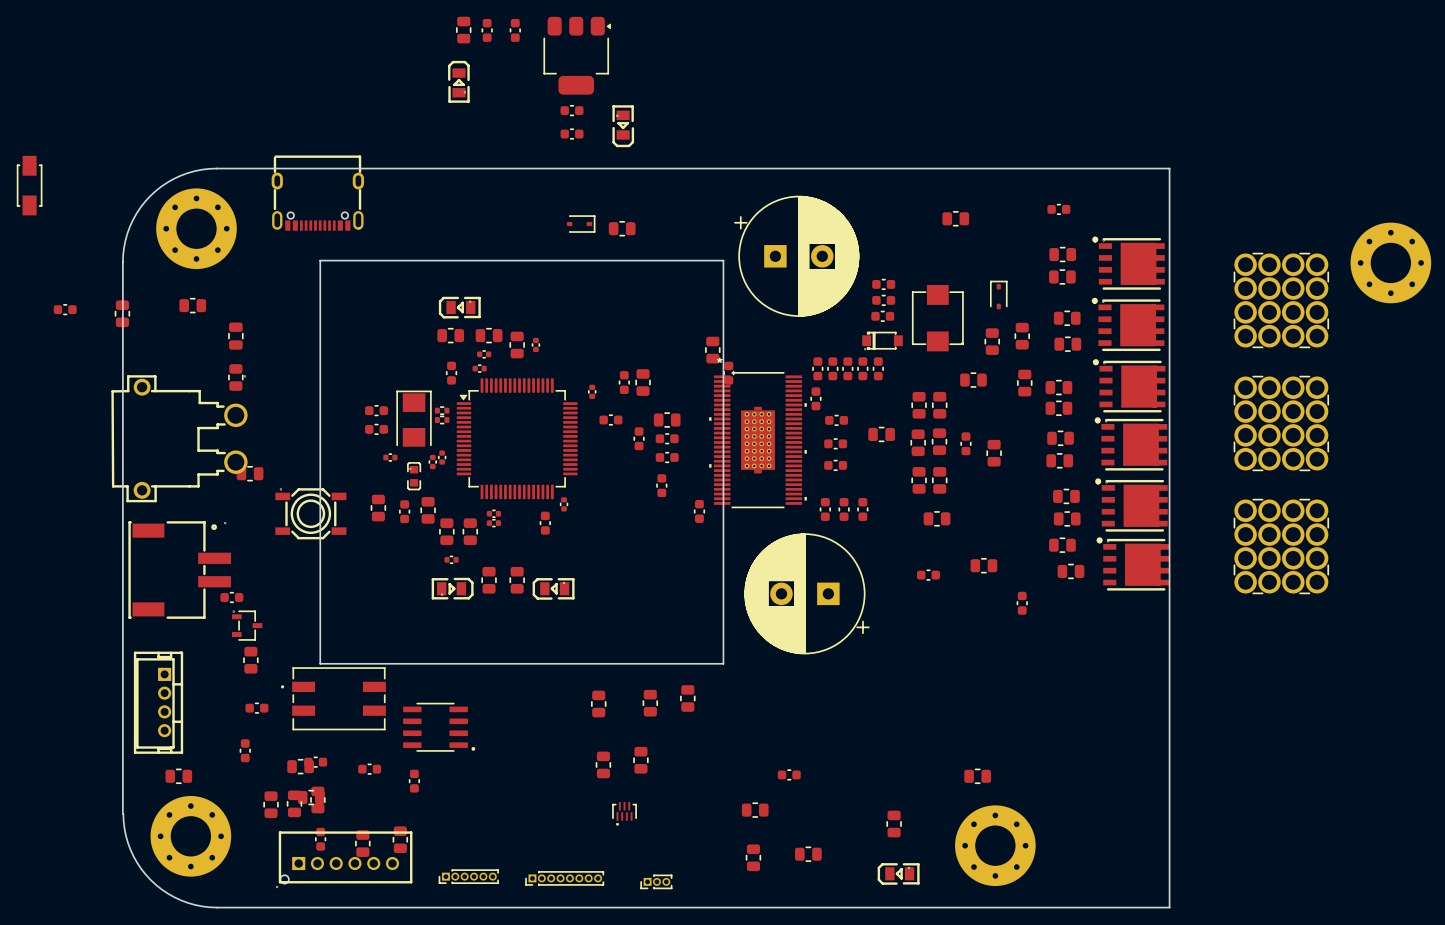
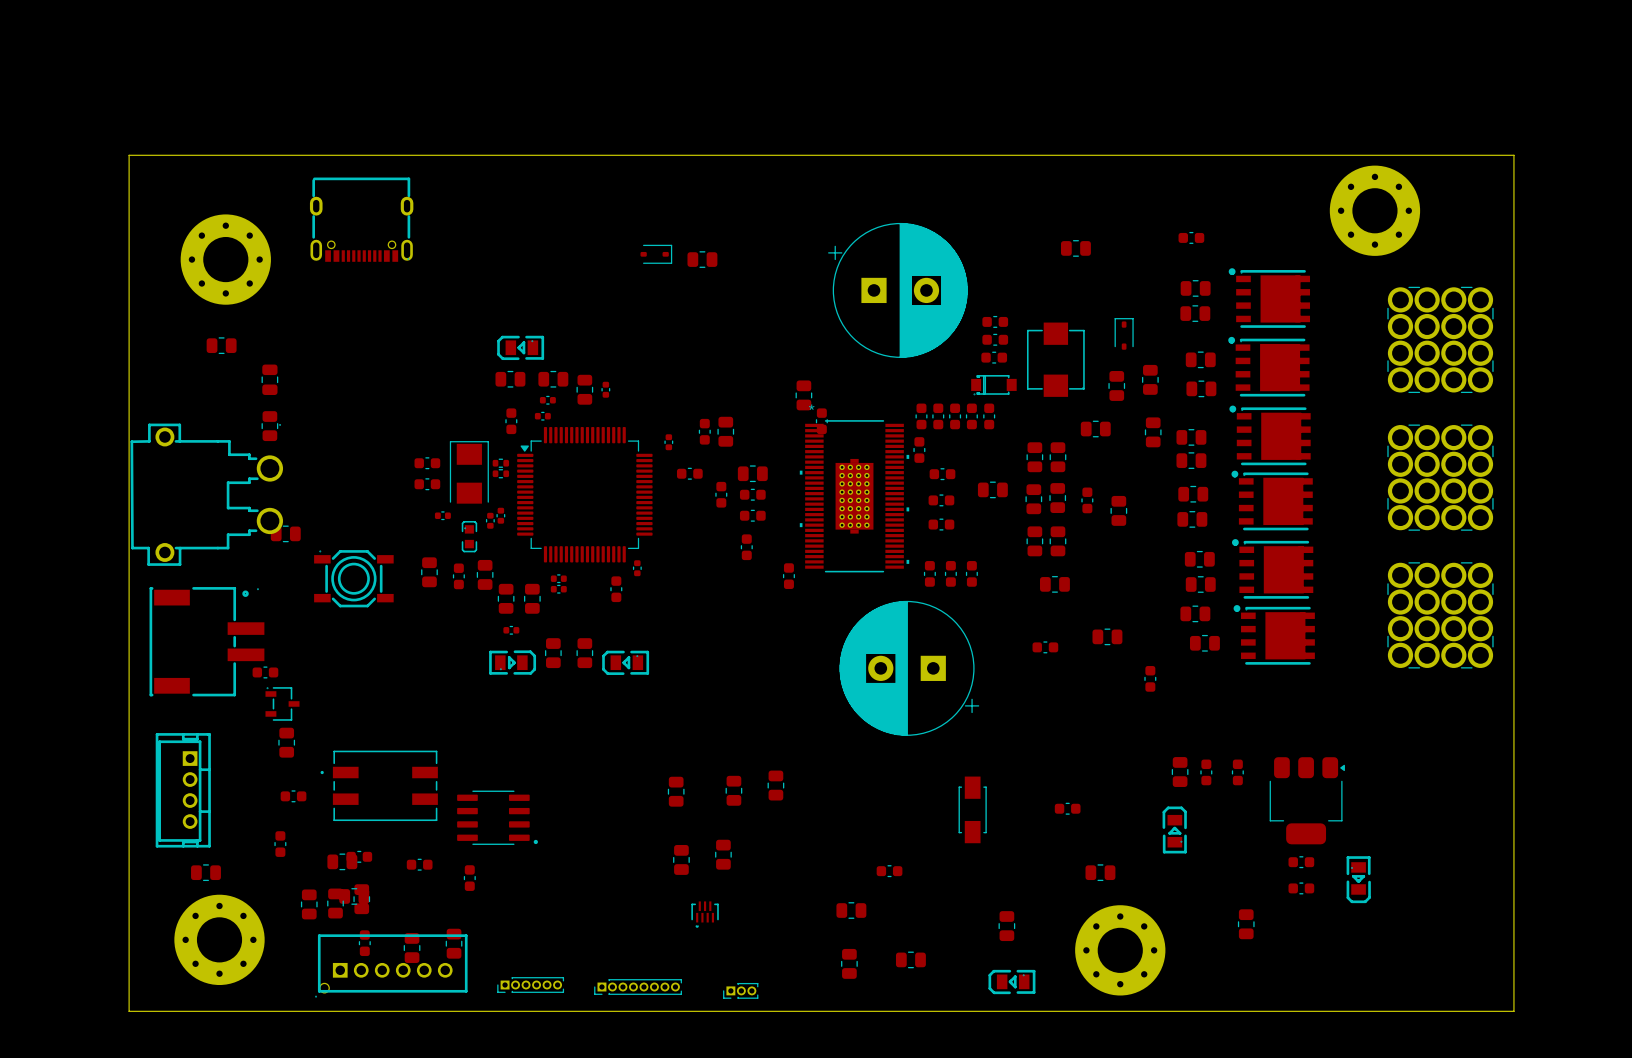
part: (463, 30) -> none
part: (487, 30) -> none
part: (515, 30) -> none
part: (577, 55) -> none
part: (458, 81) -> none
part: (572, 110) -> none
part: (623, 126) -> none
part: (572, 134) -> none
board edge: none -> (129, 155) (1513, 155) (1513, 1011) (129, 1011) (129, 155)
part: (29, 185) -> none
board edge: (320, 260) (723, 260) (723, 663) (320, 663) (320, 260) -> none
part position: (1390, 262) -> (1374, 210)
part: (65, 309) -> none
part: (122, 313) -> none
part: none -> (1180, 772)
part: none -> (1206, 772)
part: none -> (1237, 772)
part: none -> (1307, 800)
part: none -> (1067, 808)
part: none -> (972, 809)
part: none -> (1174, 829)
part: none -> (1301, 862)
part: none -> (1358, 879)
part: none -> (1301, 888)
board edge: (122, 813) (123, 254) (127, 233) (136, 213) (150, 196) (167, 182) (194, 171) (216, 168) (1169, 168) (1169, 907) -> none
board edge: (123, 813) (125, 835) (130, 849) (141, 868) (150, 880) (162, 889) (181, 900) (209, 907) (1169, 907) -> none
part: none -> (1246, 924)

